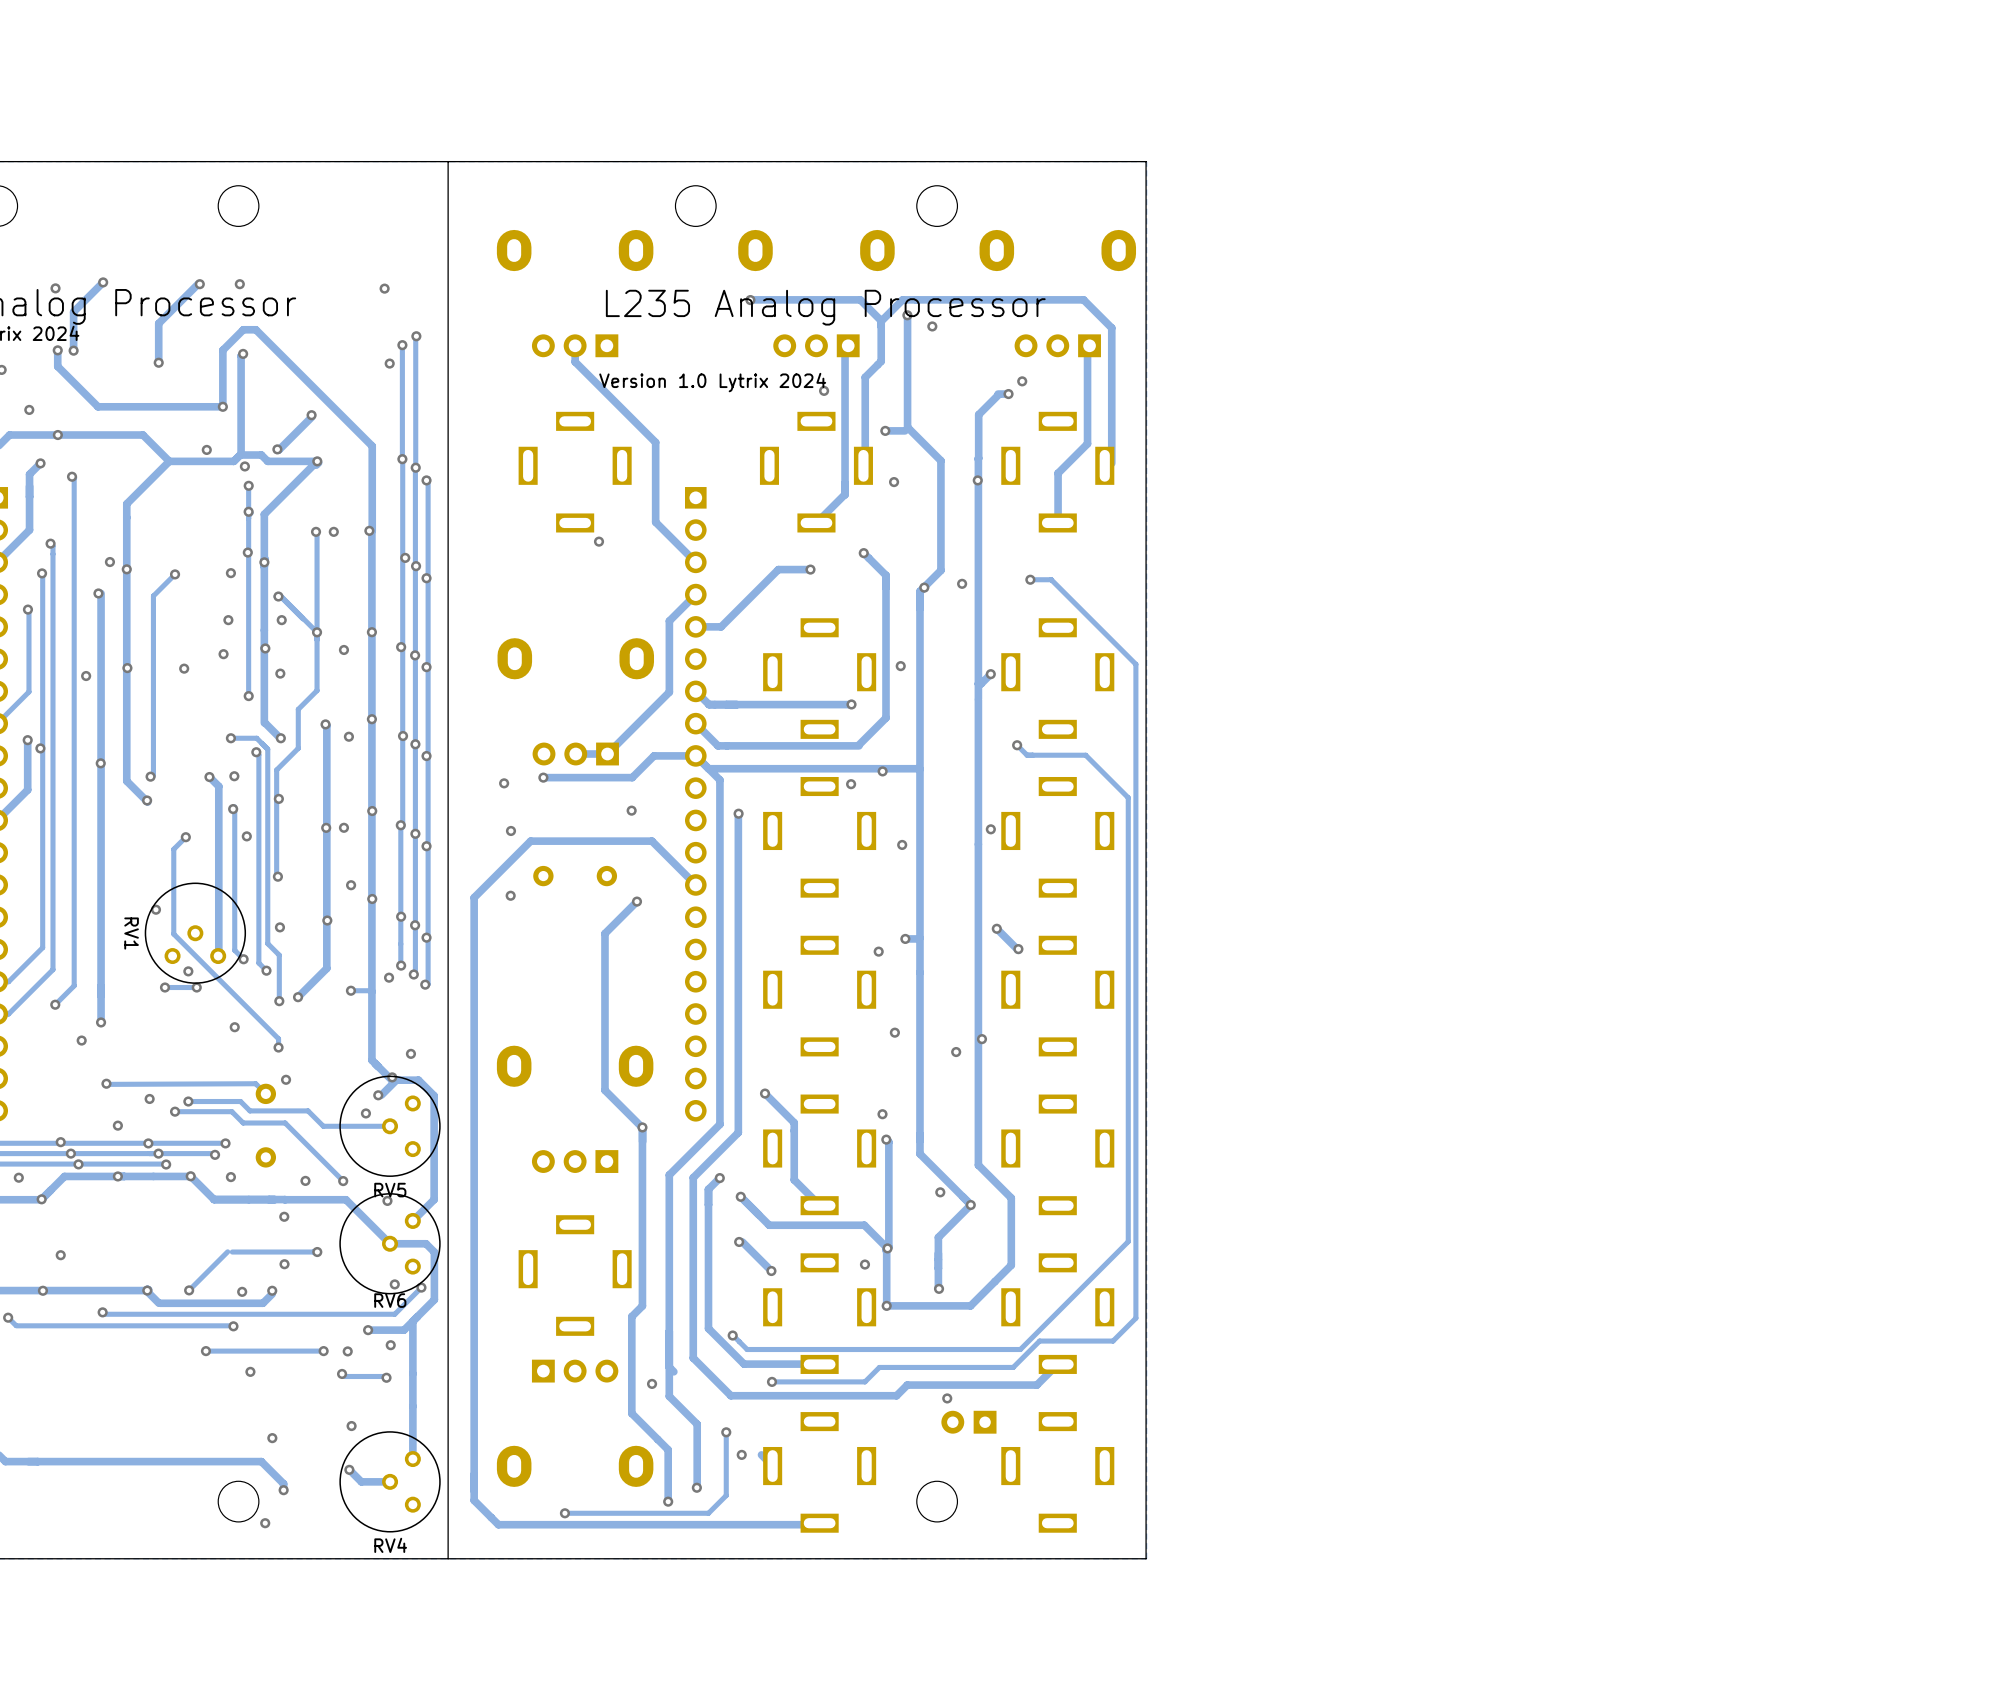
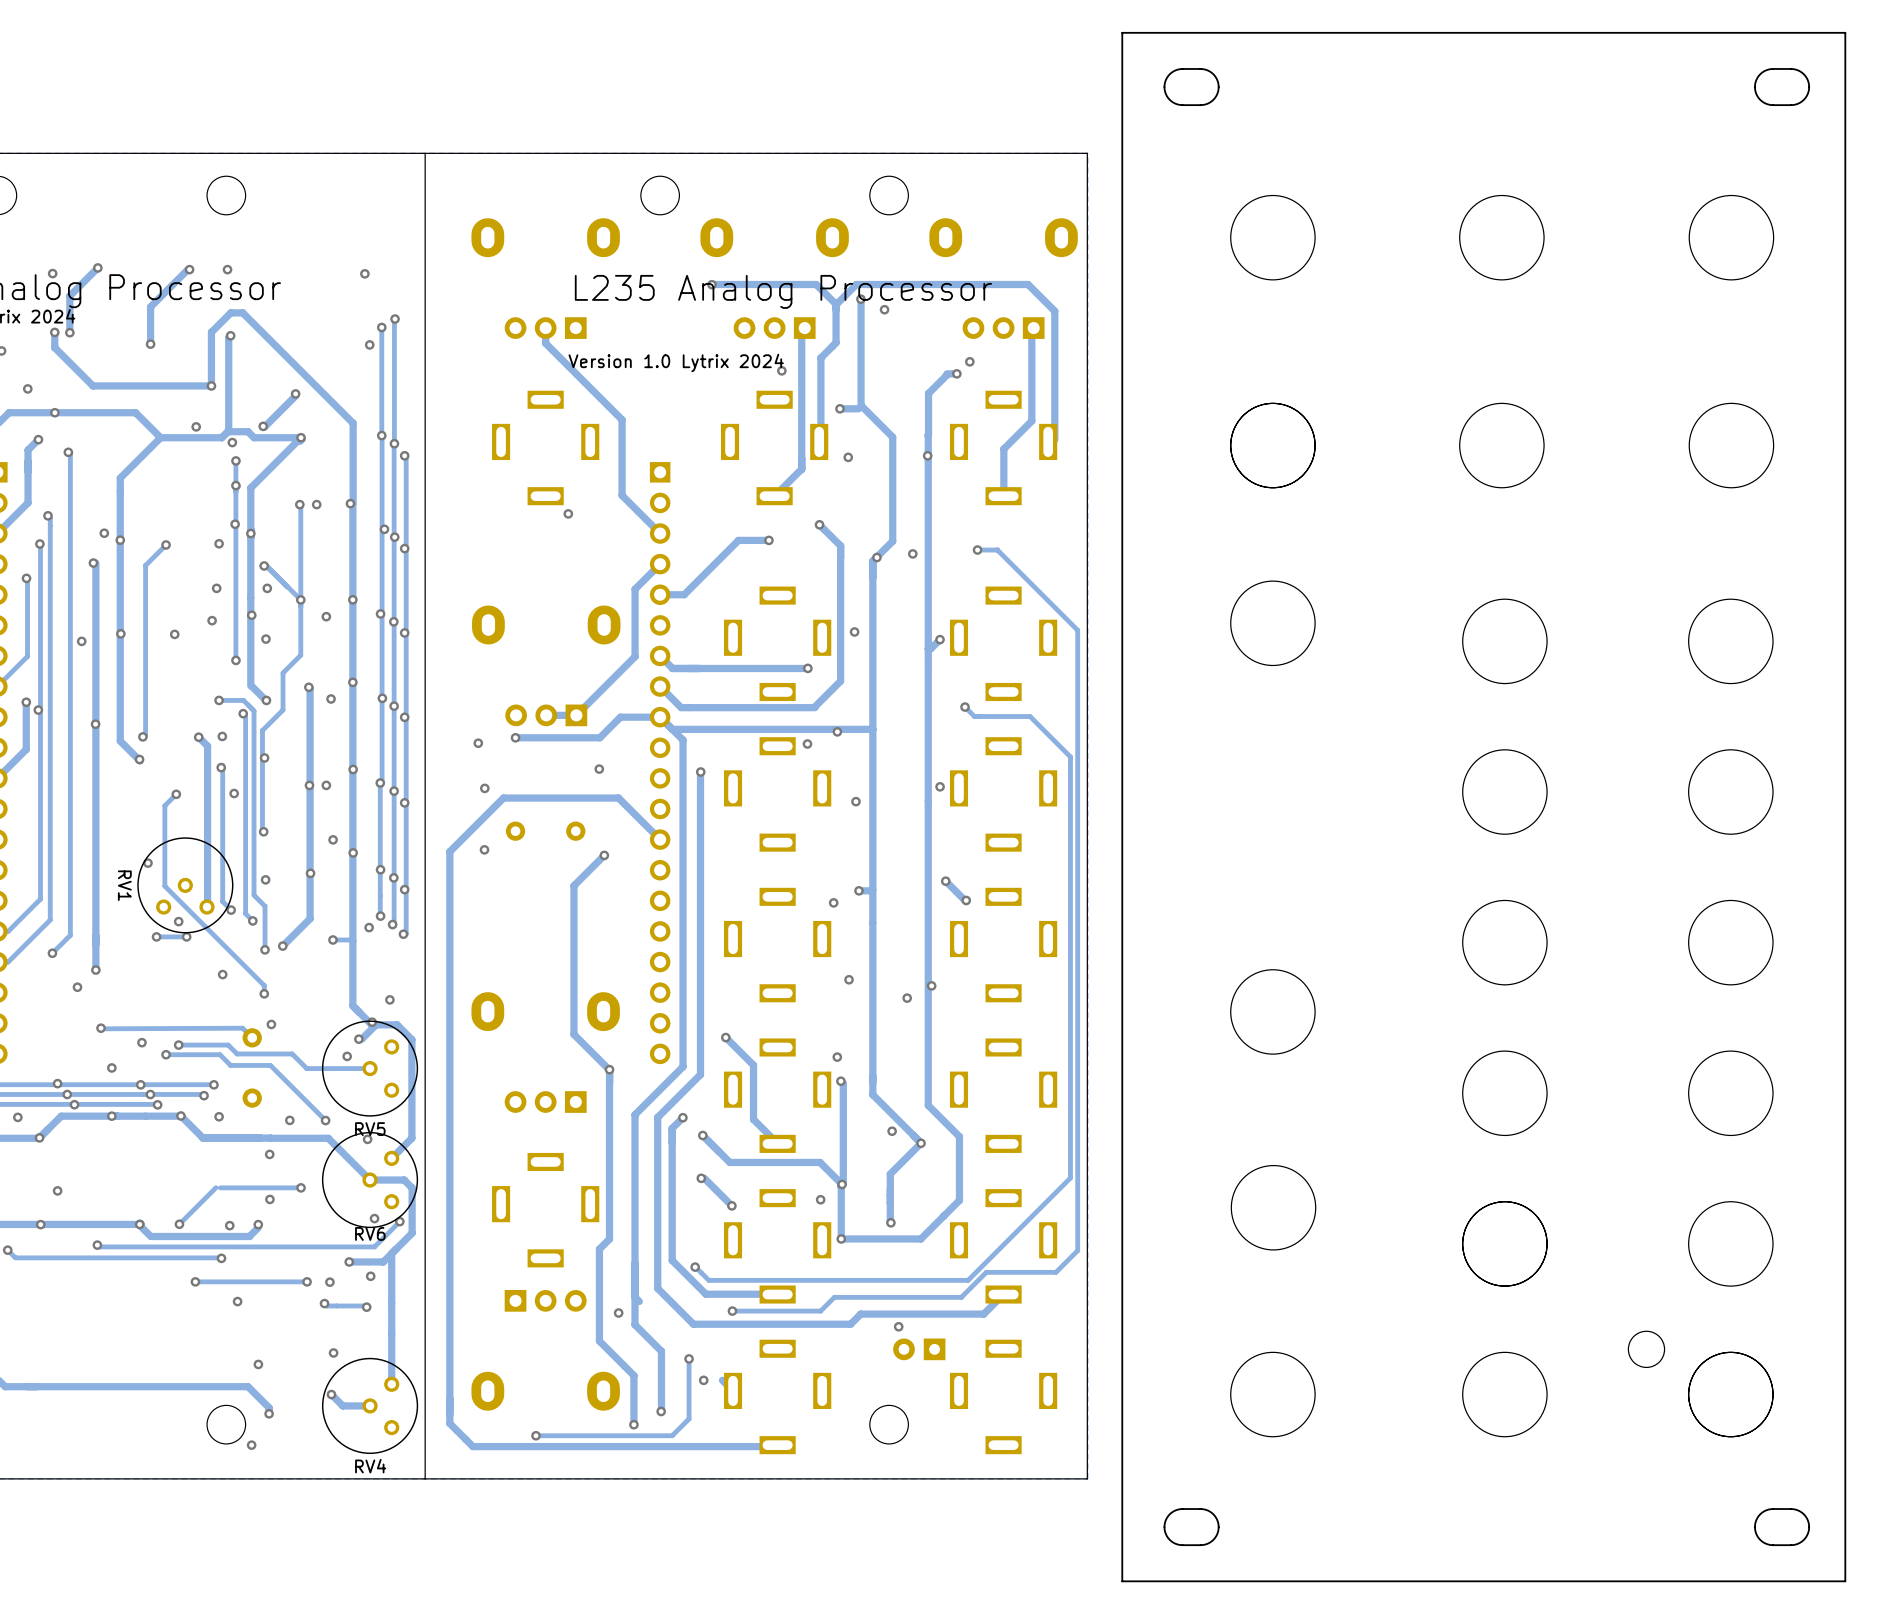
board edge: none -> (1845, 32) (1122, 32) (1122, 1581) (1845, 1581) (1845, 32)
board edge: none -> (1200, 68) (1180, 69) (1169, 74) (1164, 87) (1169, 99) (1180, 104) (1200, 105) (1213, 99) (1218, 89) (1217, 80) (1211, 72) (1200, 68)
board edge: none -> (1791, 68) (1770, 69) (1760, 74) (1754, 87) (1760, 99) (1773, 105) (1793, 104) (1803, 99) (1809, 89) (1807, 80) (1800, 71) (1791, 68)
round board edge: none -> [1230, 194, 1316, 281]
round board edge: none -> [1459, 194, 1545, 281]
round board edge: none -> [1688, 194, 1775, 281]
round board edge: none -> [1230, 402, 1316, 489]
round board edge: none -> [1459, 402, 1545, 489]
round board edge: none -> [1688, 402, 1775, 489]
round board edge: none -> [1230, 580, 1316, 667]
round board edge: none -> [1462, 598, 1548, 685]
round board edge: none -> [1688, 598, 1774, 685]
round board edge: none -> [1462, 749, 1548, 835]
round board edge: none -> [1688, 749, 1774, 835]
round board edge: none -> [1462, 899, 1548, 986]
round board edge: none -> [1688, 899, 1774, 986]
round board edge: none -> [1230, 969, 1316, 1055]
round board edge: none -> [1462, 1050, 1548, 1137]
round board edge: none -> [1688, 1050, 1774, 1137]
round board edge: none -> [1230, 1164, 1317, 1251]
round board edge: none -> [1462, 1201, 1548, 1287]
round board edge: none -> [1688, 1201, 1774, 1287]
round board edge: none -> [1627, 1330, 1666, 1369]
round board edge: none -> [1230, 1351, 1316, 1438]
round board edge: none -> [1462, 1351, 1548, 1438]
round board edge: none -> [1688, 1351, 1774, 1438]
board edge: none -> (1200, 1509) (1180, 1509) (1169, 1514) (1164, 1527) (1169, 1539) (1182, 1545) (1202, 1545) (1213, 1539) (1218, 1529) (1217, 1520) (1209, 1511) (1200, 1509)
board edge: none -> (1791, 1509) (1770, 1509) (1760, 1514) (1754, 1527) (1760, 1539) (1770, 1545) (1791, 1545) (1803, 1539) (1809, 1529) (1807, 1520) (1802, 1512) (1791, 1509)

